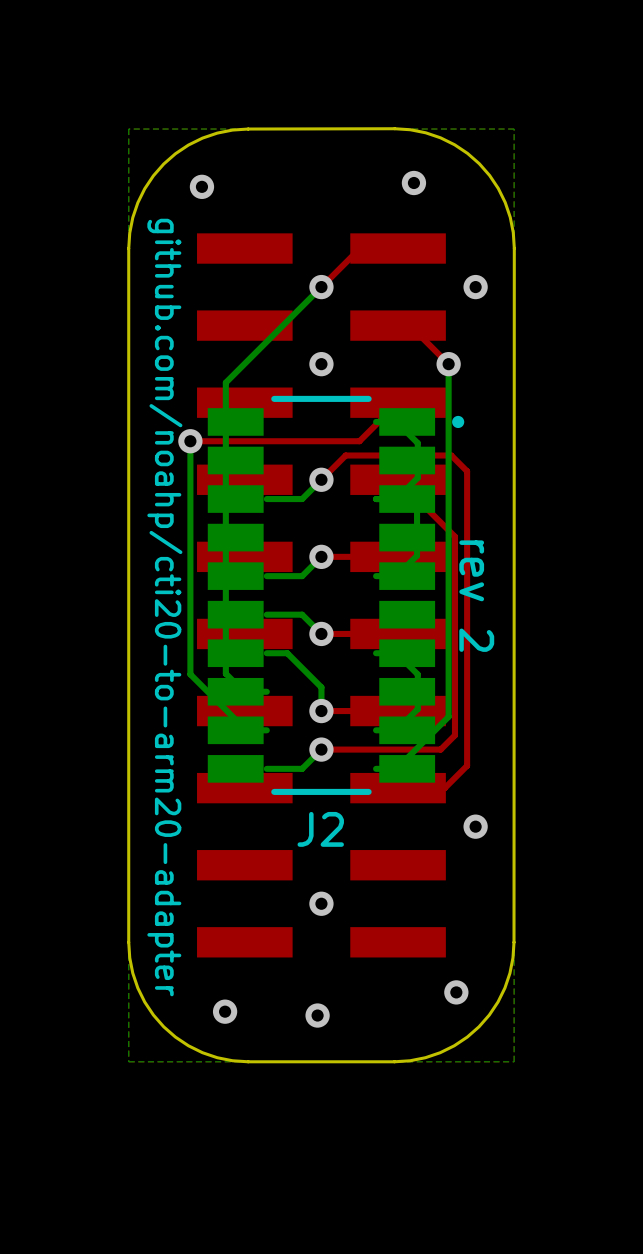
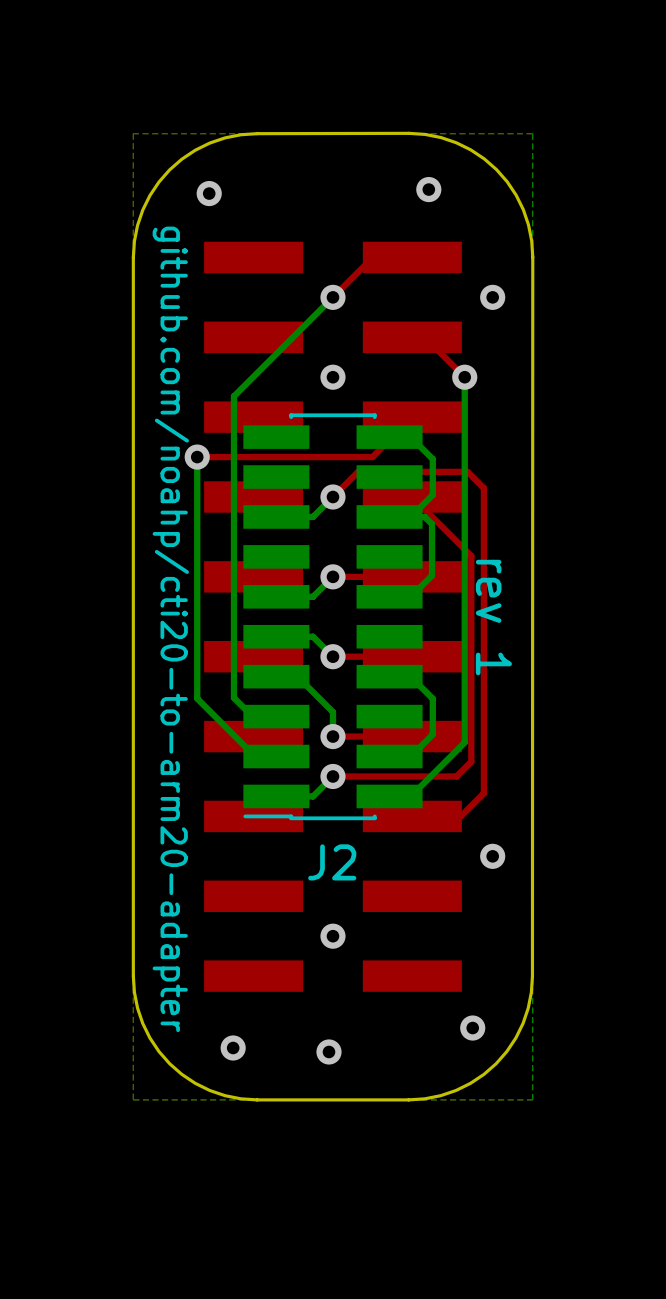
J2 footprint: [207, 395, 465, 795] -> [243, 413, 423, 821]
text: rev 2 (476, 596) -> rev 1 (493, 617)

